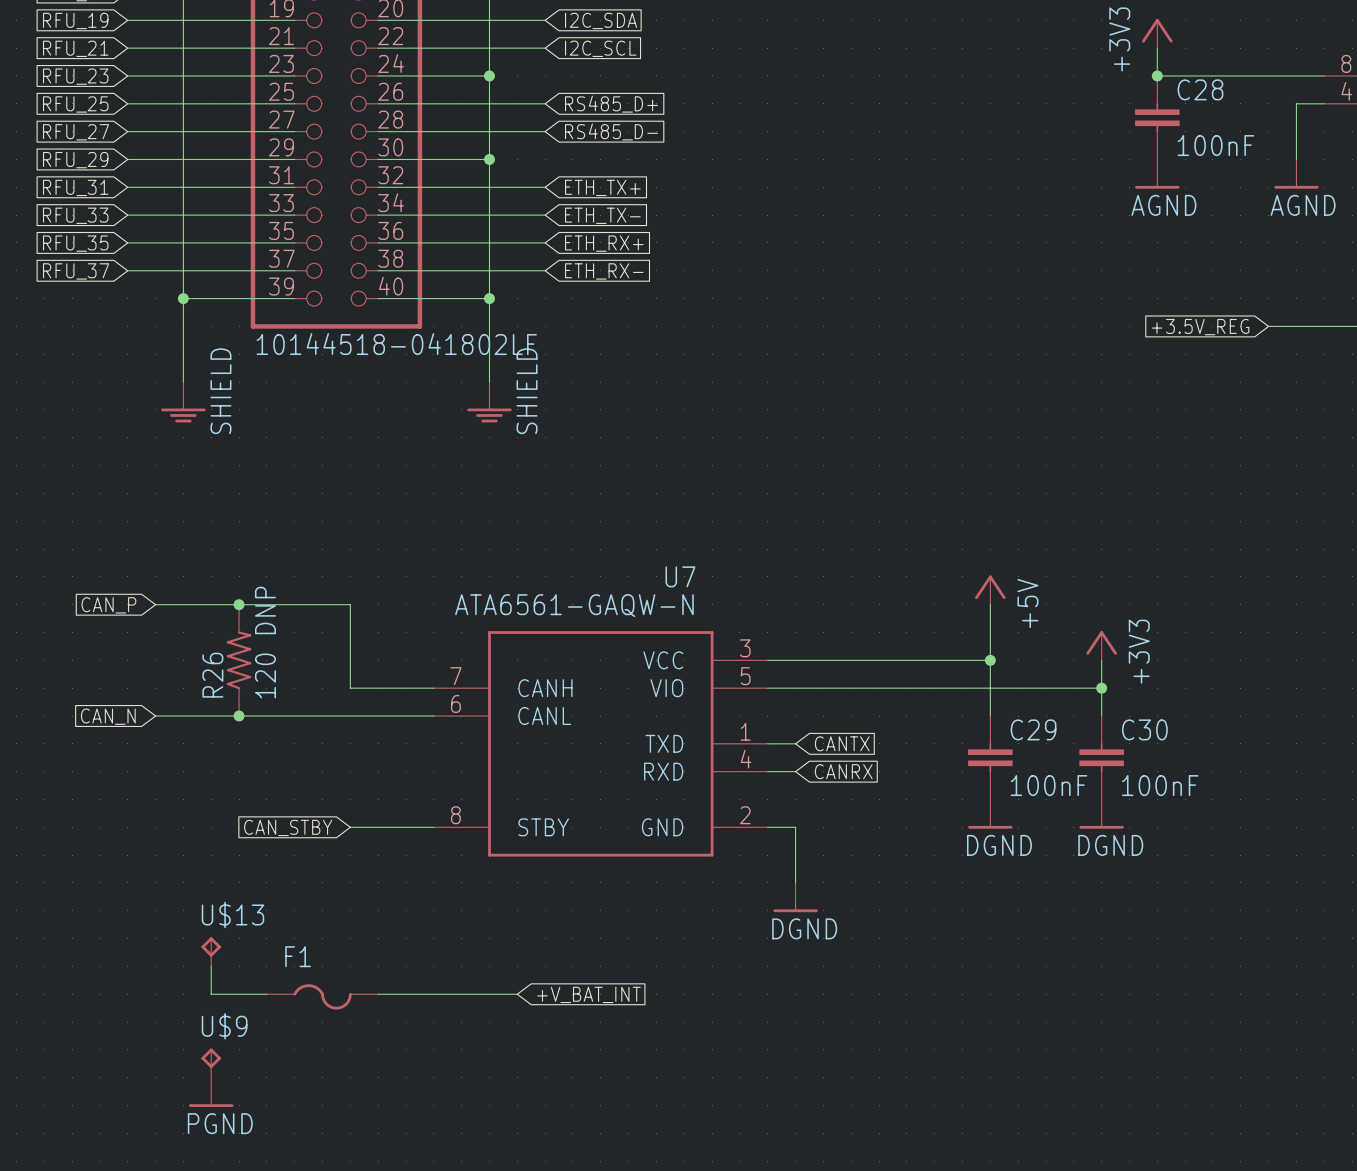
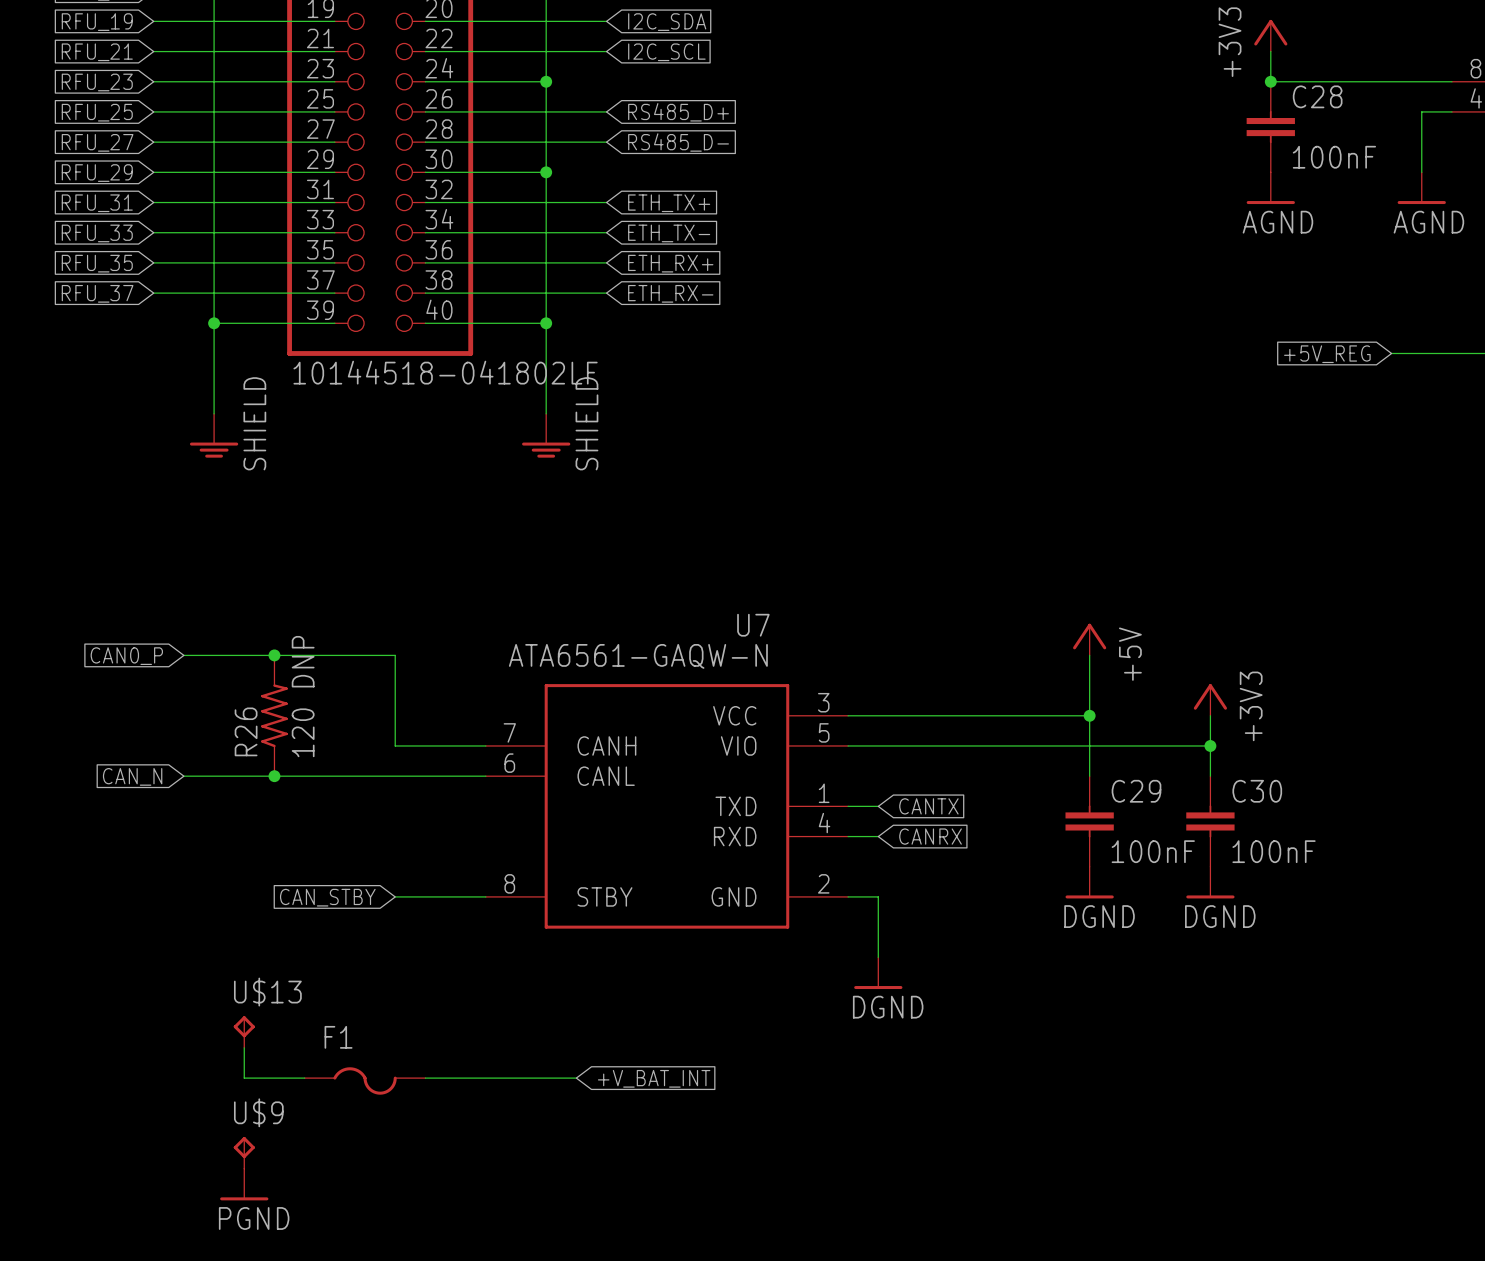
global label: +3.5V_REG (1200, 327) -> +5V_REG (1327, 354)
global label: CAN_P (108, 605) -> CAN0_P (126, 656)

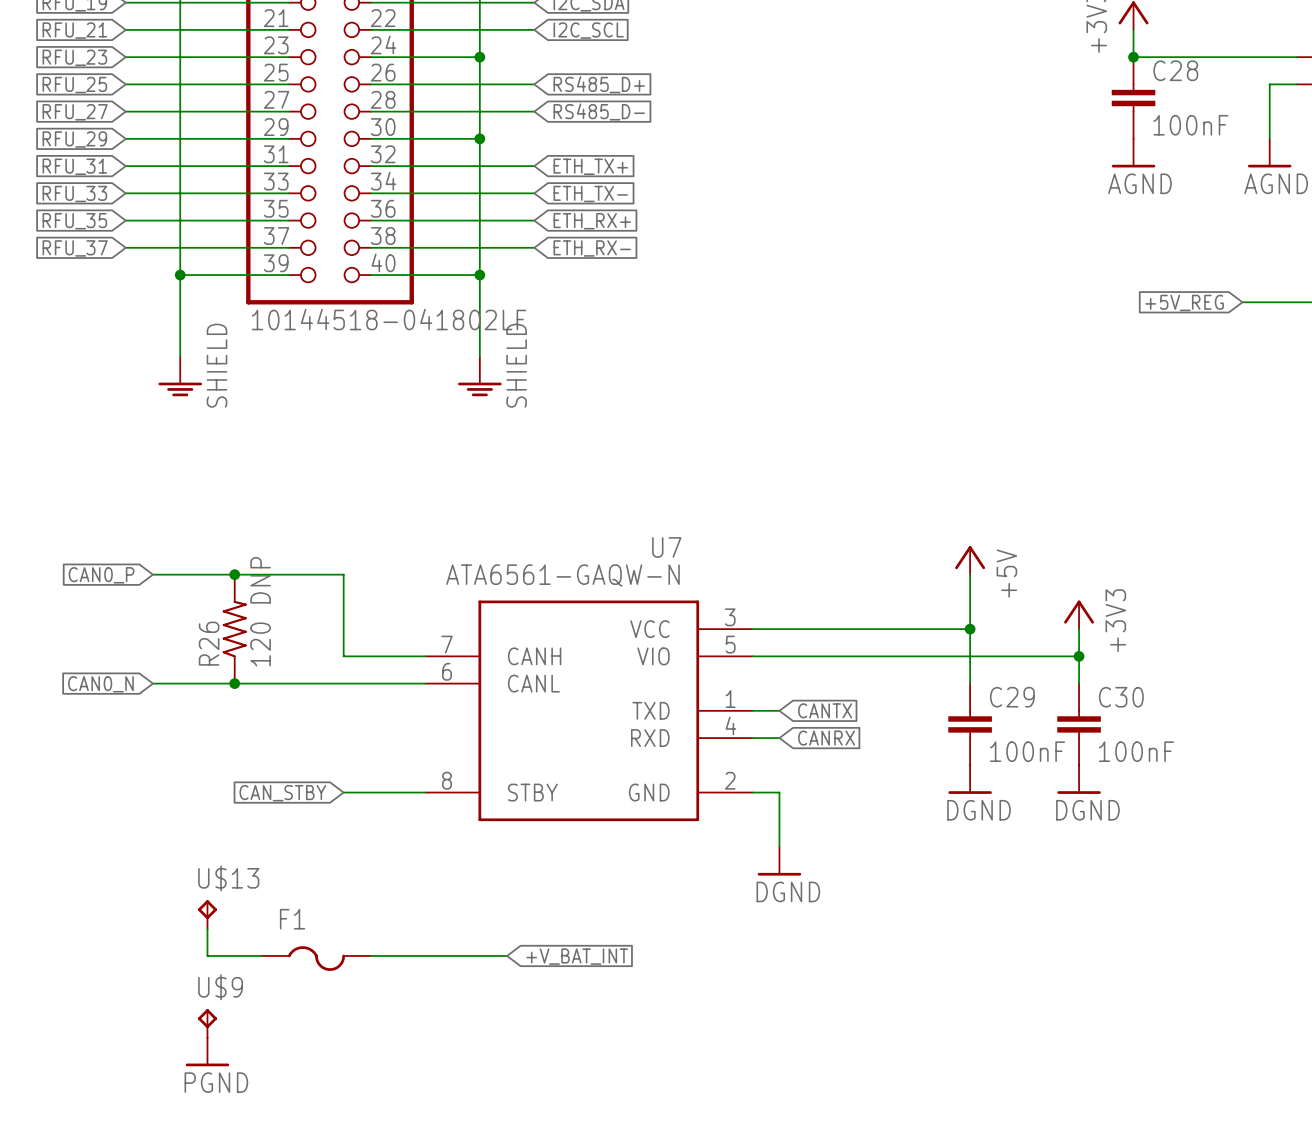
global label: CAN_N (132, 776) -> CAN0_N (100, 684)

